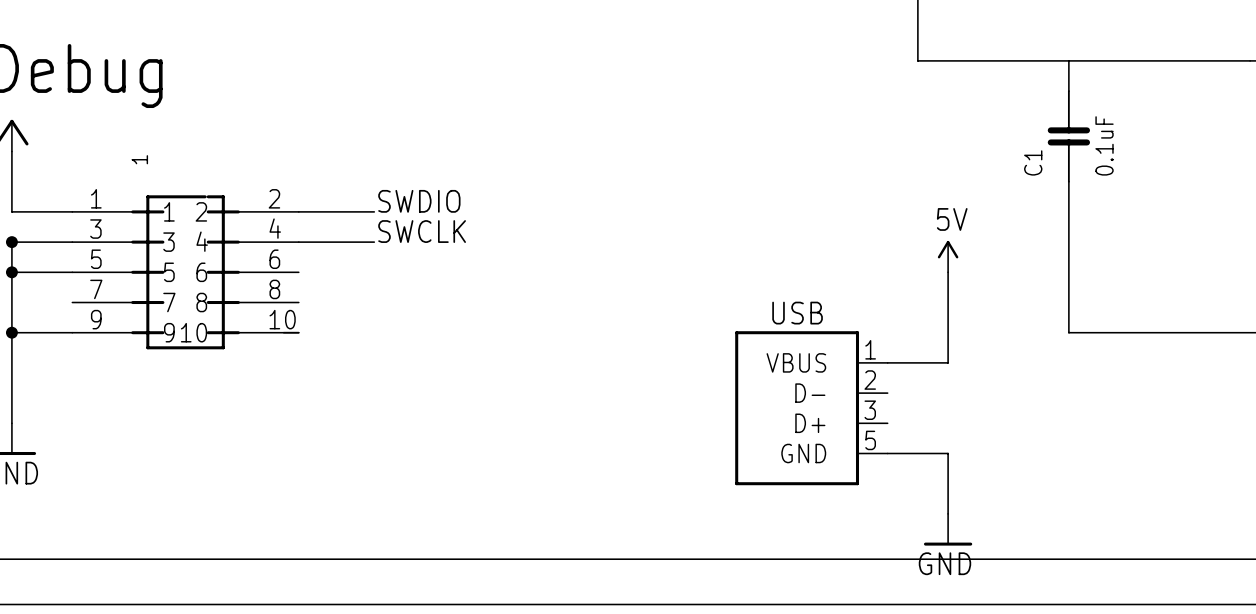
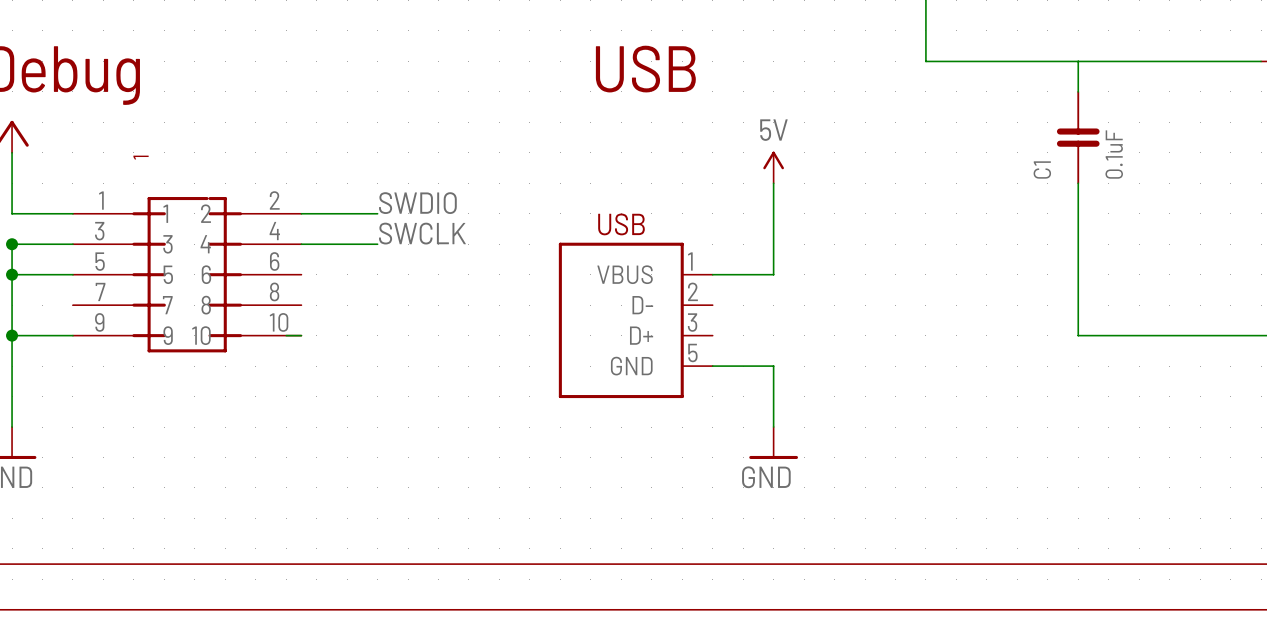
text: none -> USB (645, 69)
power symbol position: 5V (948, 256) -> 5V (773, 167)
wire: (948, 272) (948, 362) (887, 362) -> (773, 183) (773, 274) (712, 274)
part position: (811, 408) -> (635, 320)
wire: (887, 453) (948, 453) (948, 513) -> (712, 366) (773, 366) (773, 427)
power symbol position: GND (948, 529) -> GND (773, 443)

